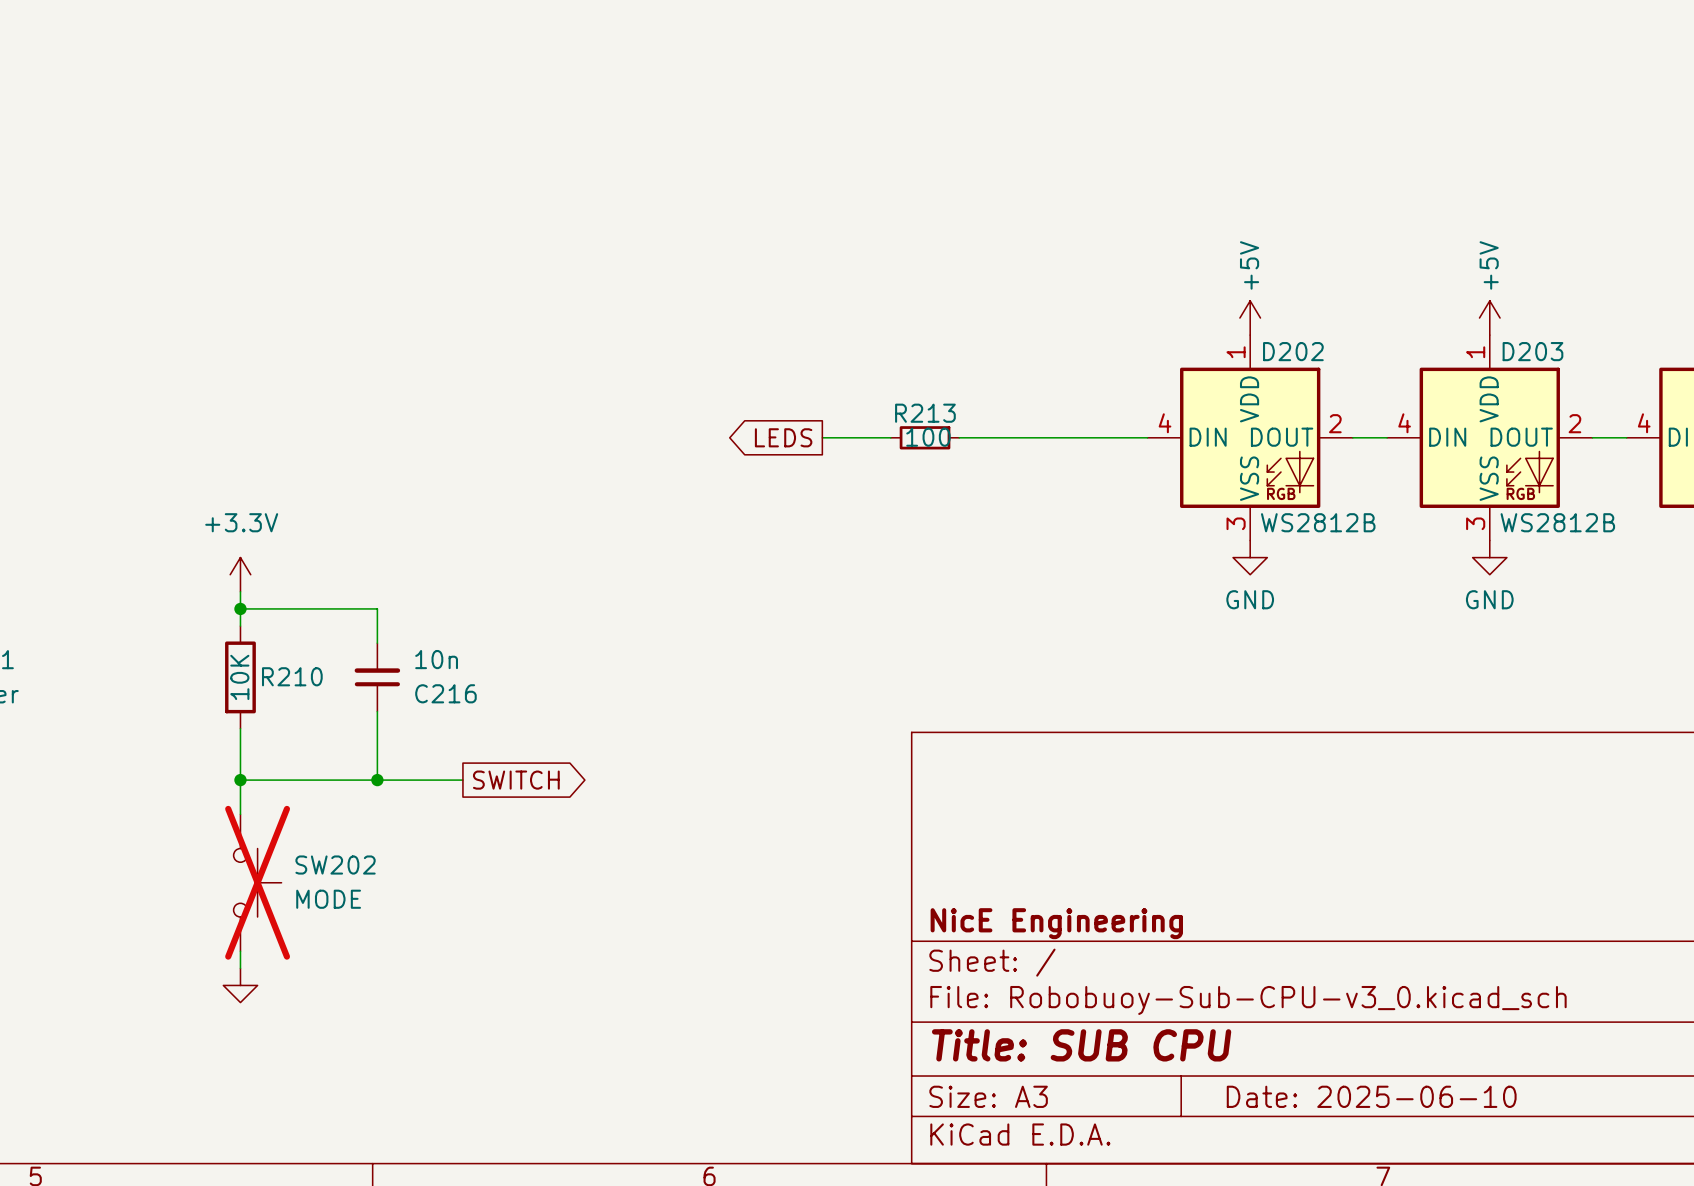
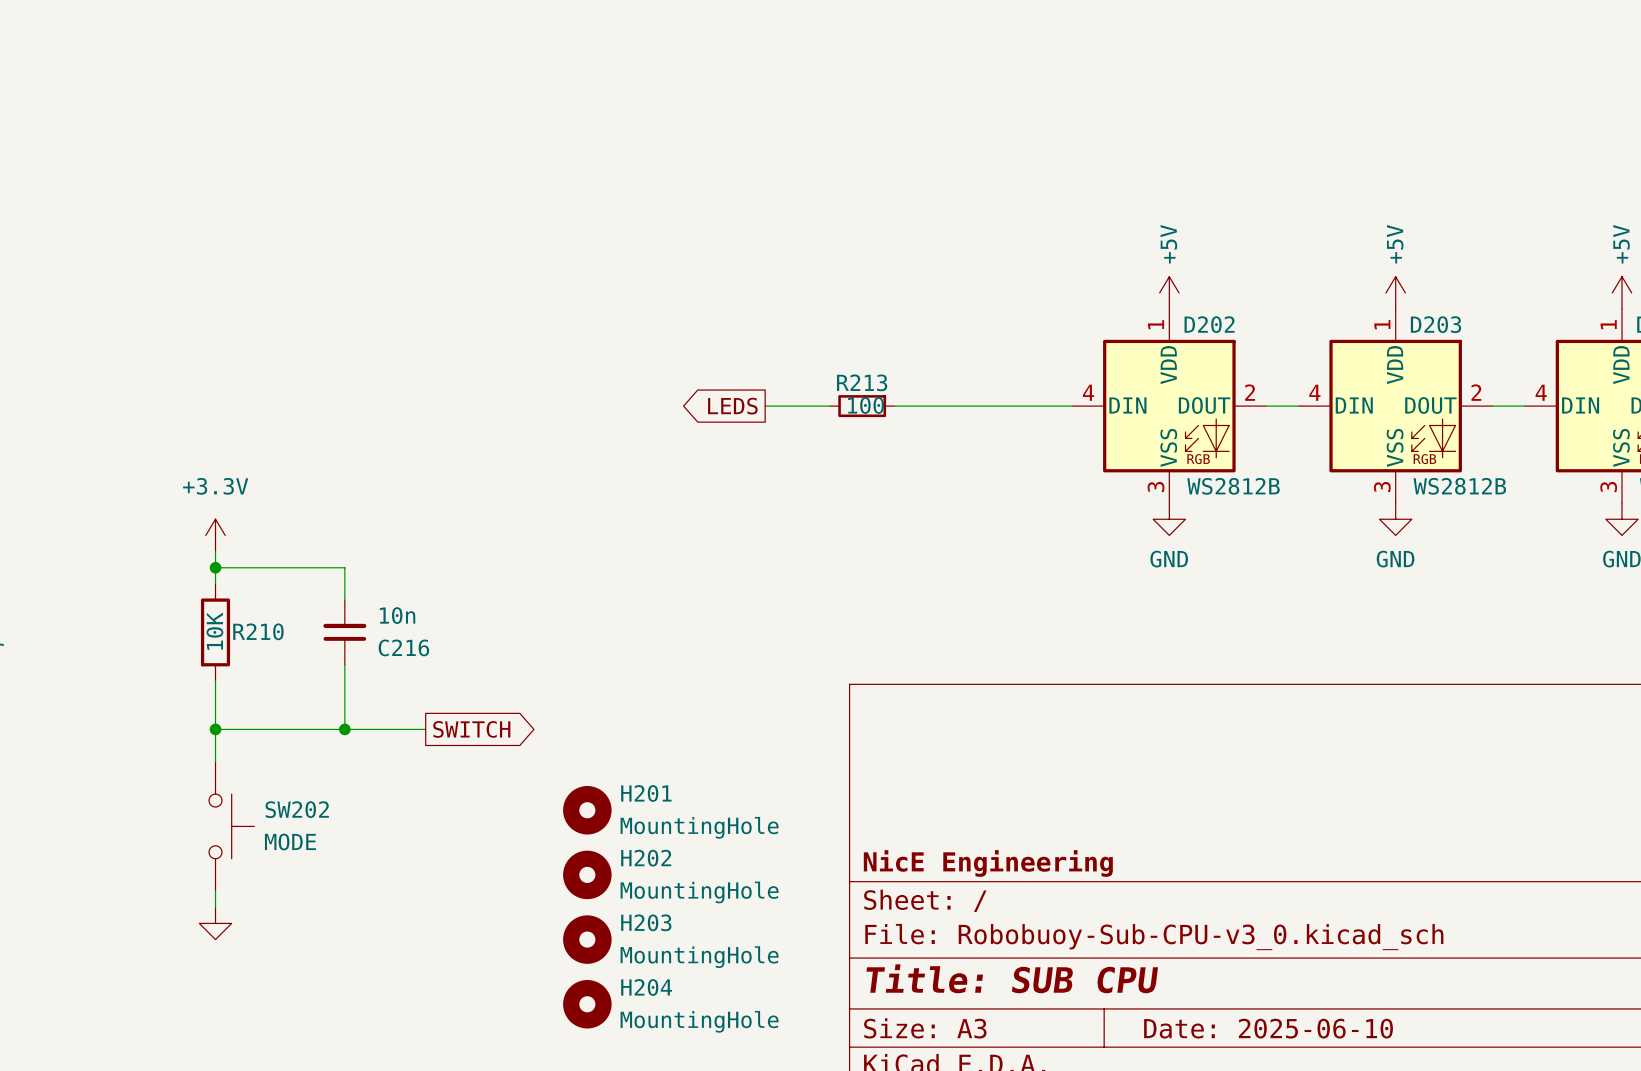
H201: none -> MountingHole (587, 810)
SW202 do-not-place cross: (257, 882) -> none
H202: none -> MountingHole (587, 874)
H203: none -> MountingHole (587, 939)
H204: none -> MountingHole (587, 1004)

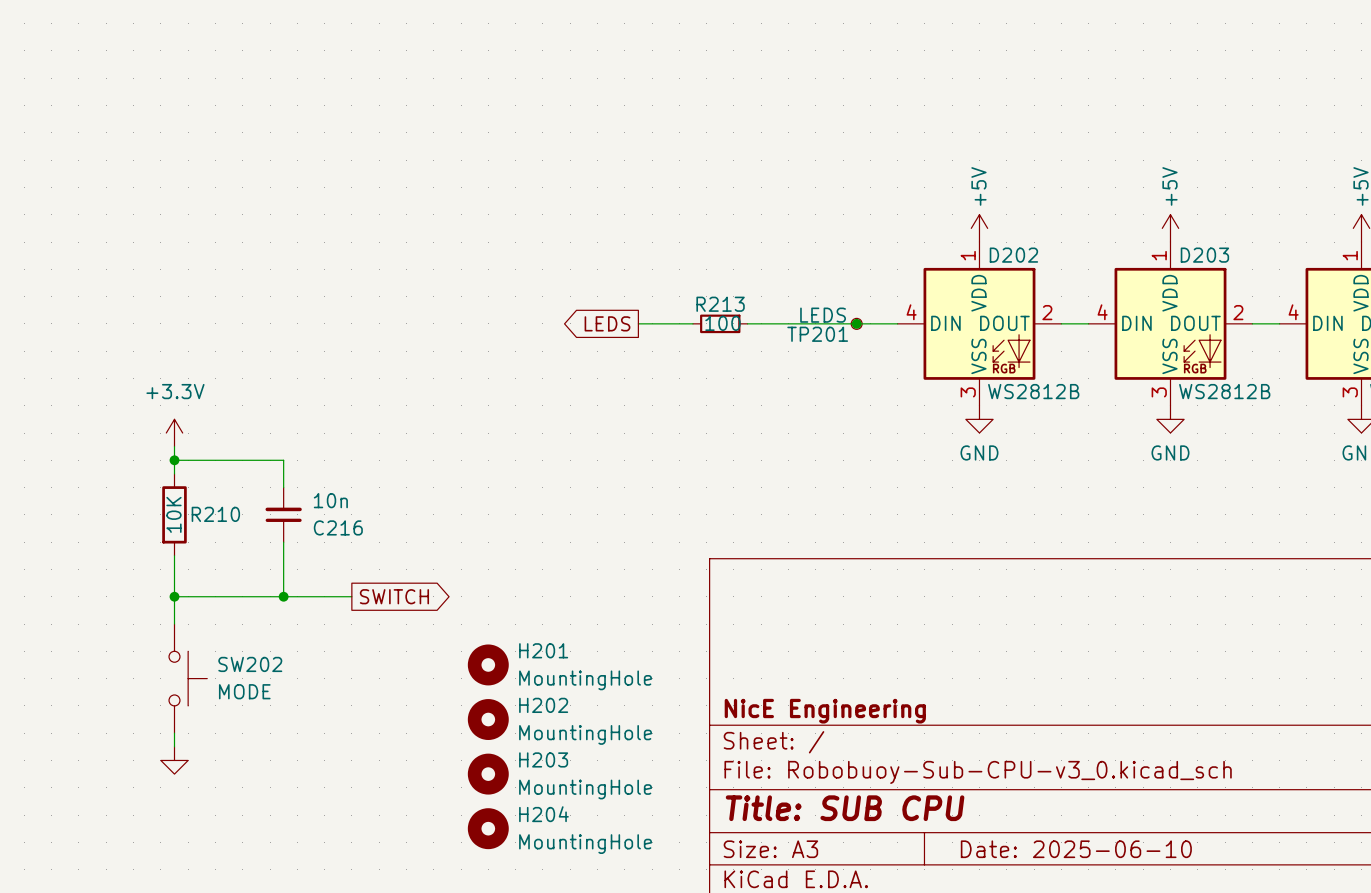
junction: none -> (856, 323)
TP201: none -> LEDS (856, 323)

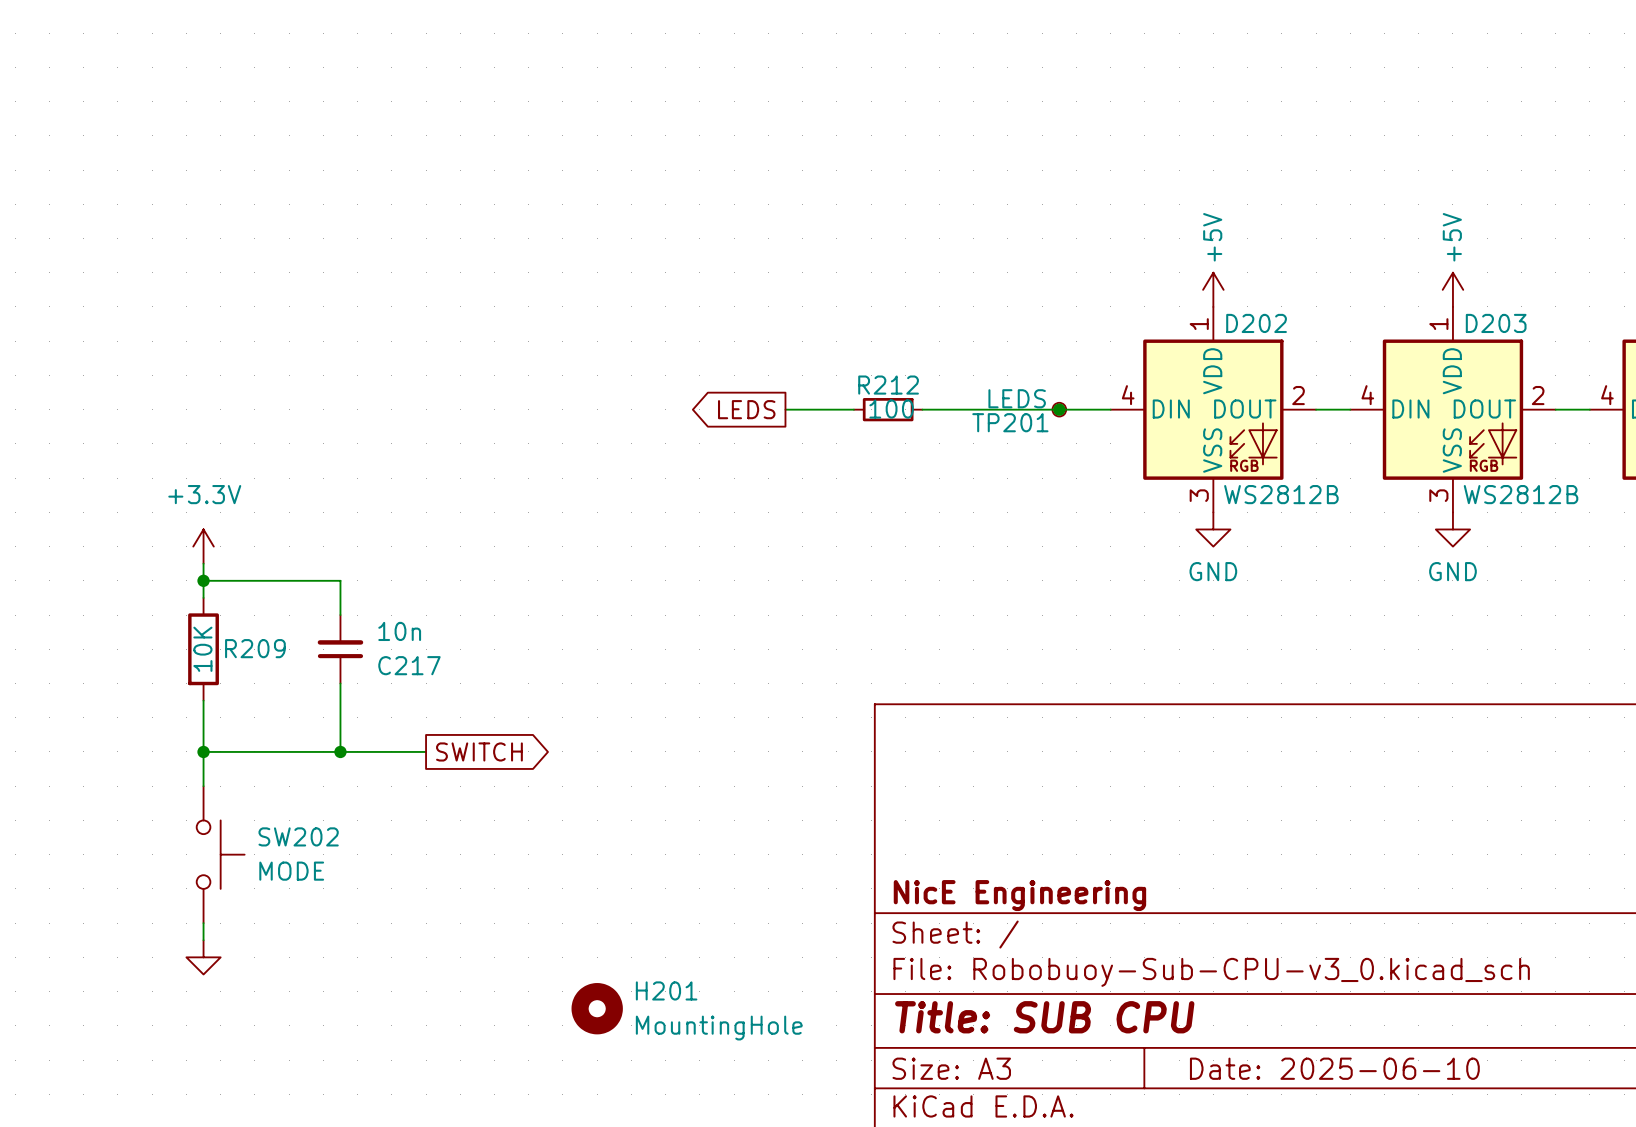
R213 name: R213 (720, 304) -> R212 (888, 385)
R210 name: R210 (215, 514) -> R209 (255, 648)
C216 name: C216 (338, 527) -> C217 (409, 665)
H201 position: (488, 664) -> (597, 1008)
H202: MountingHole (488, 719) -> none
H203: MountingHole (488, 774) -> none
H204: MountingHole (488, 828) -> none

